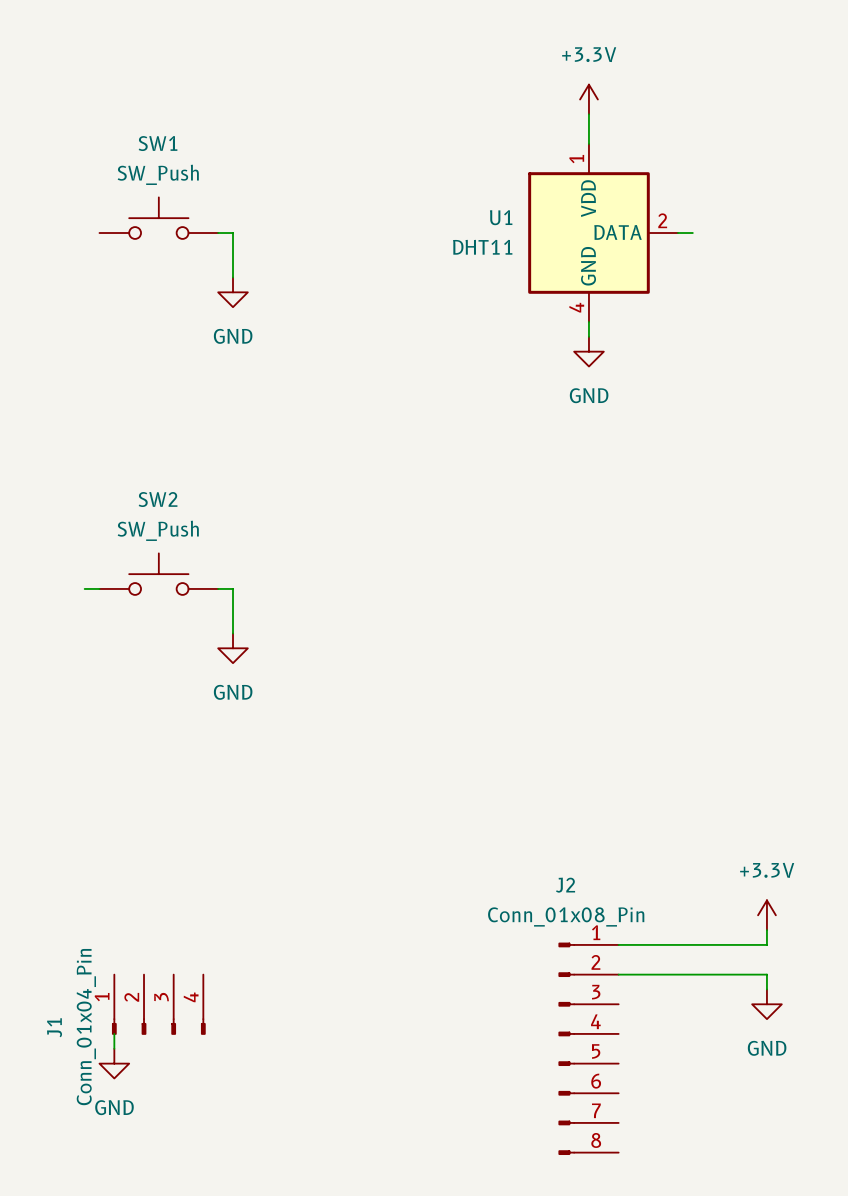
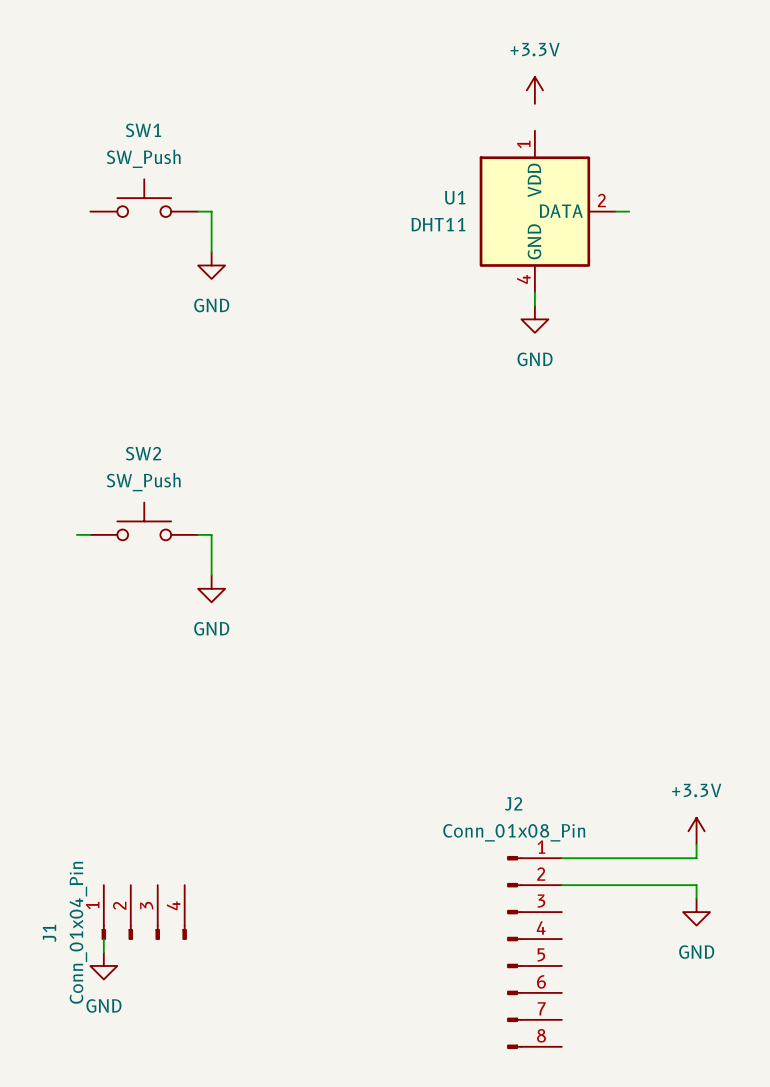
wire: (588, 114) (588, 144) -> none

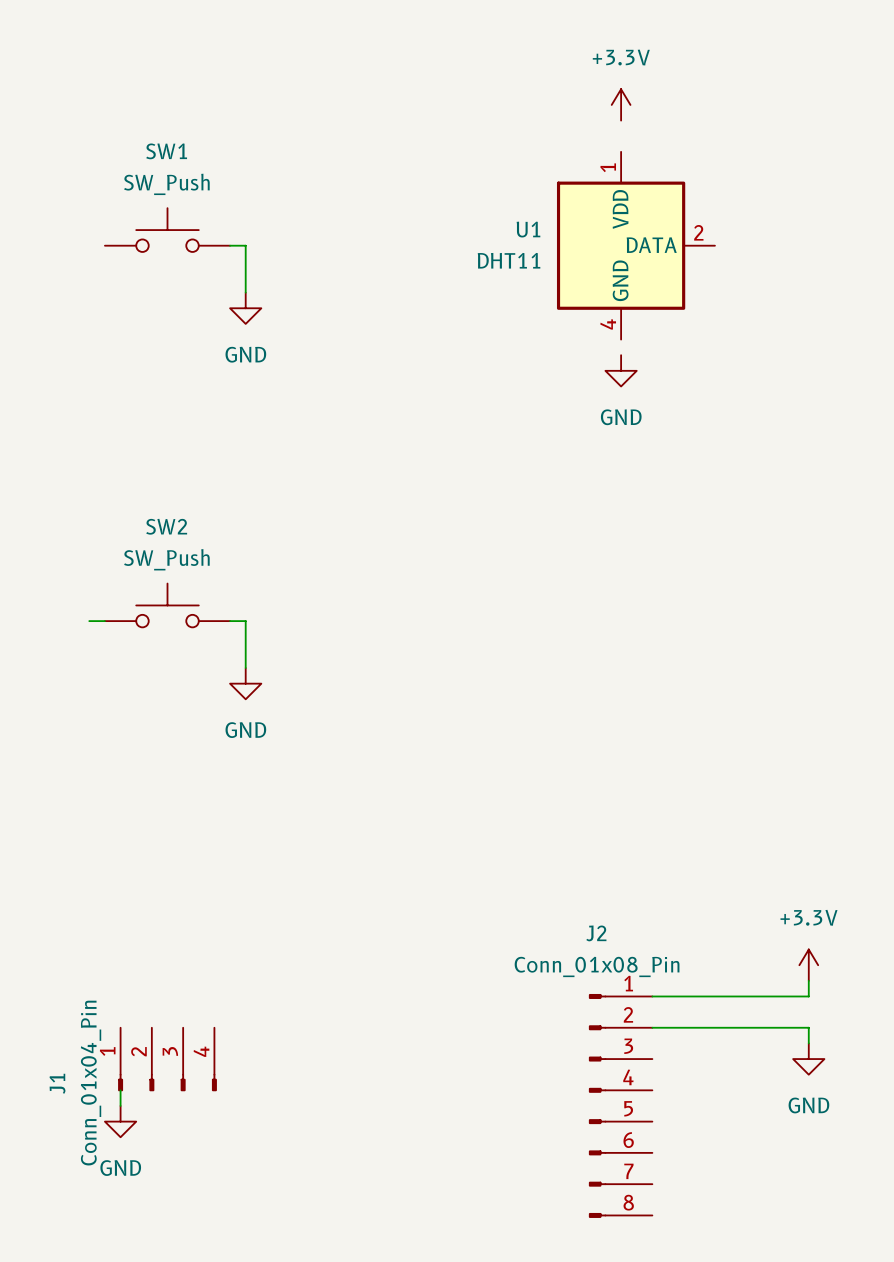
wire: (615, 211) (629, 211) -> none
wire: (534, 292) (534, 305) -> none

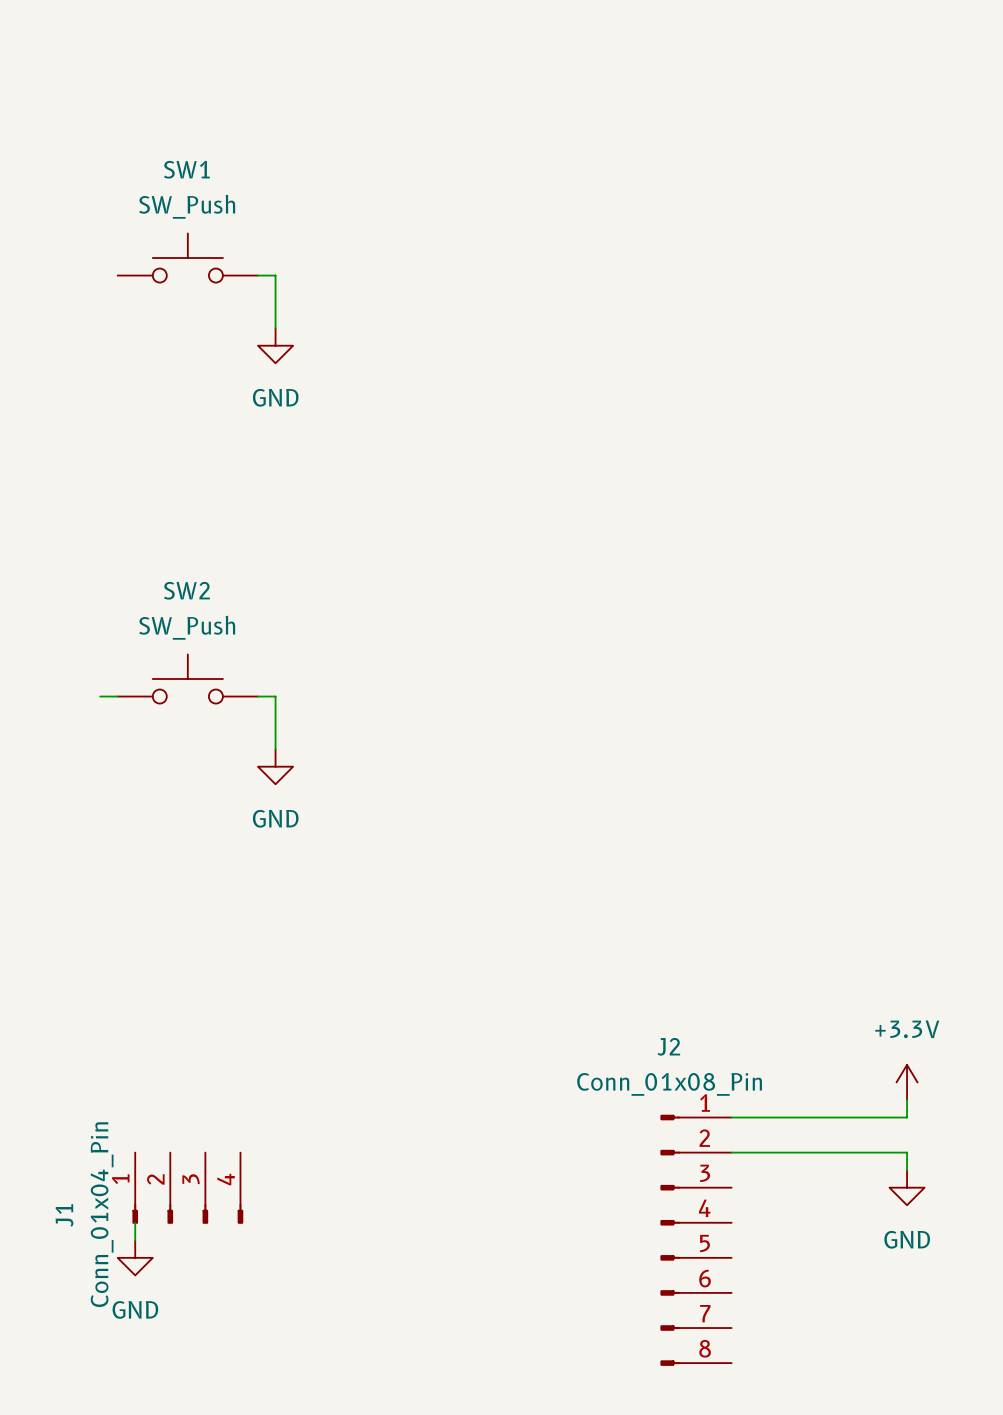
power symbol: +3.3V (621, 104) -> none
U1: DHT11 (635, 245) -> none
power symbol: GND (621, 370) -> none

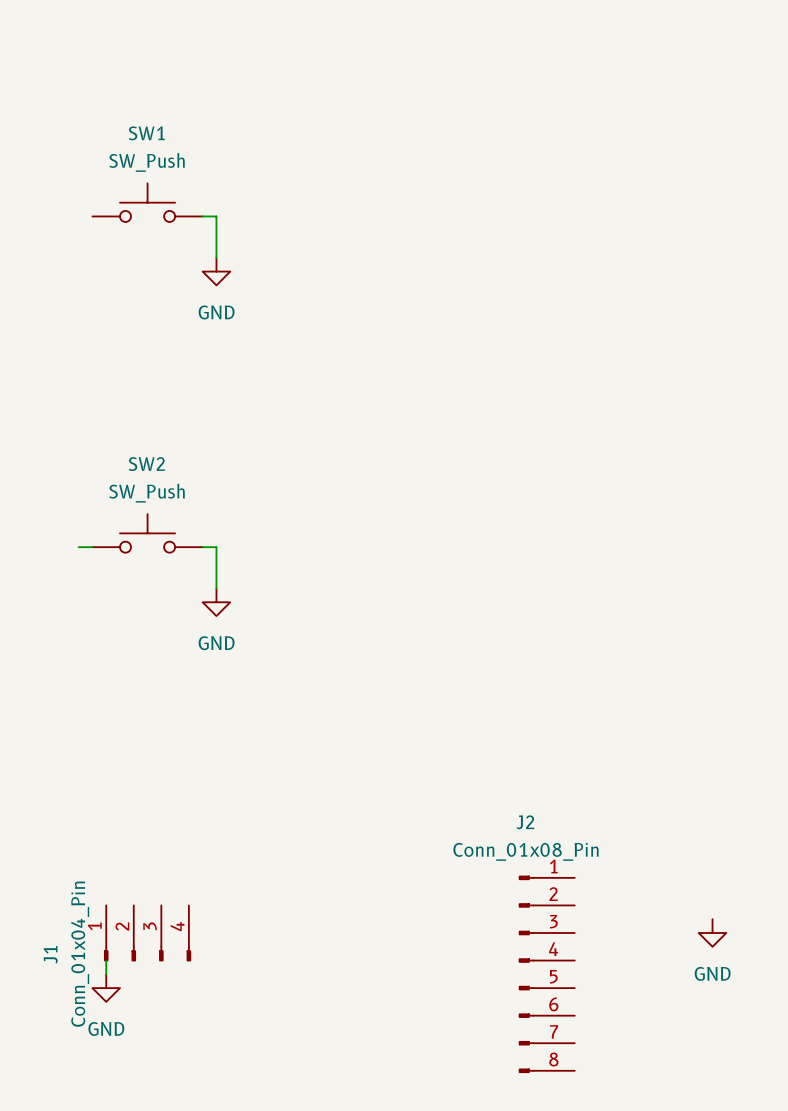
power symbol: +3.3V (907, 1082) -> none
wire: (907, 1099) (907, 1117) (731, 1117) -> none
wire: (731, 1152) (907, 1152) (907, 1170) -> none

